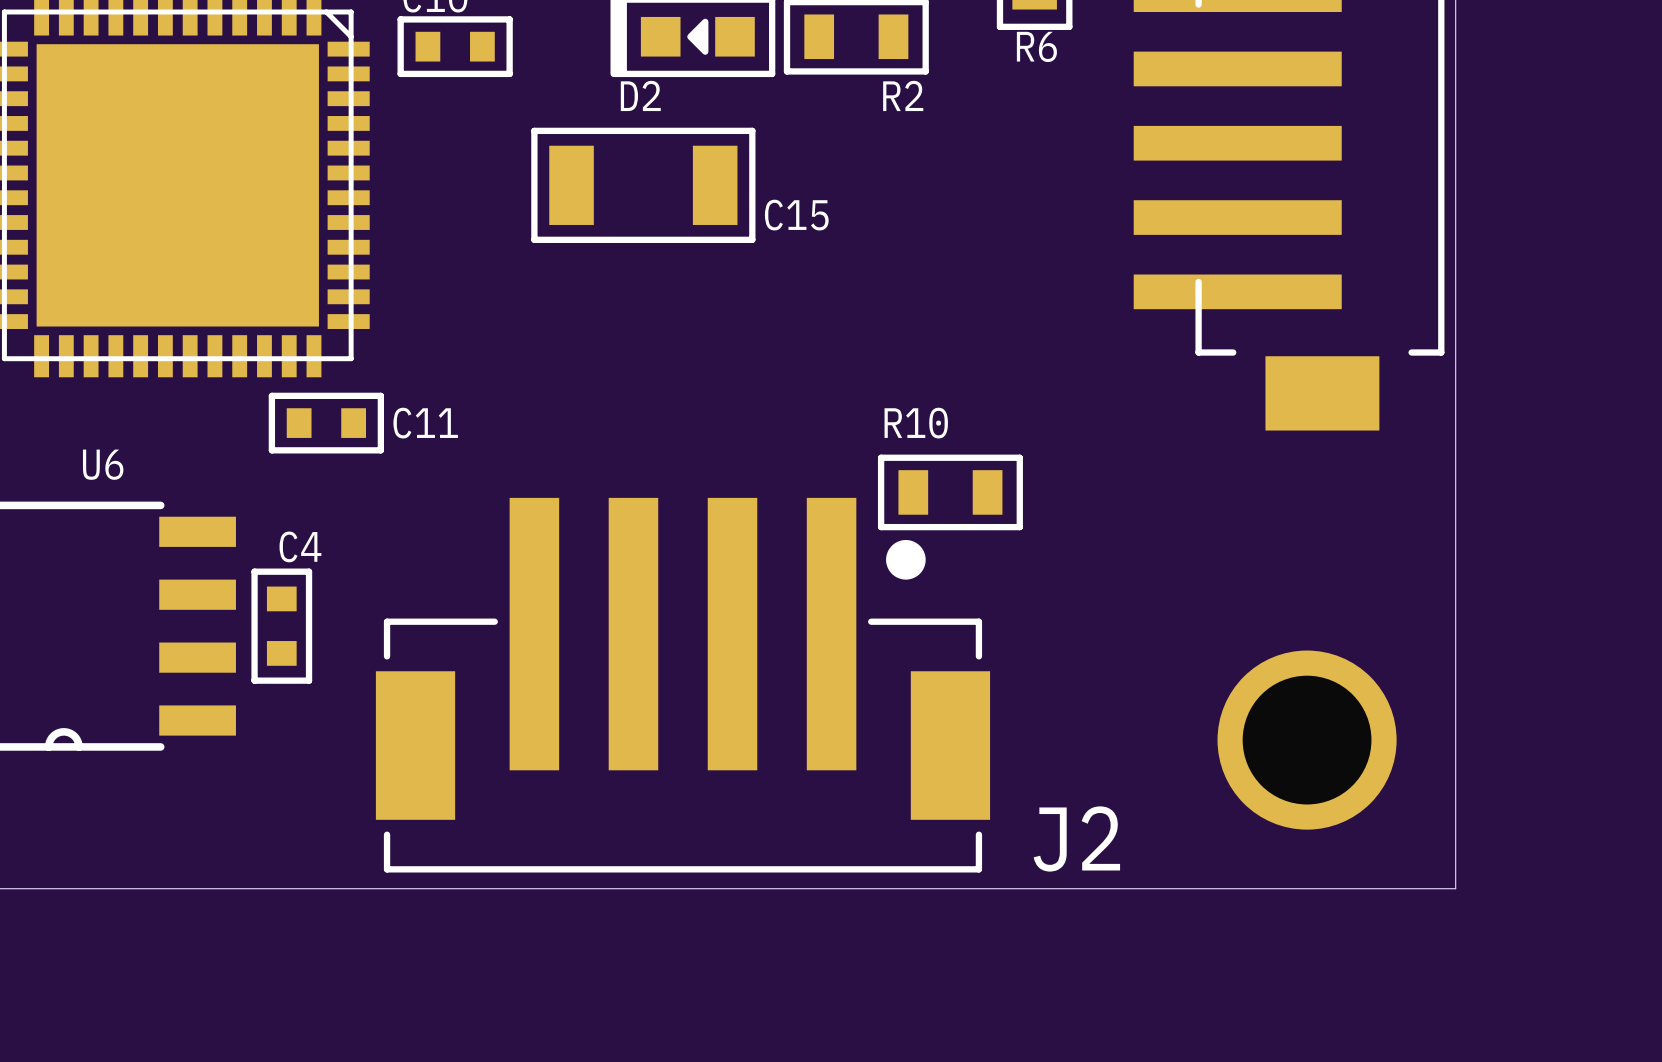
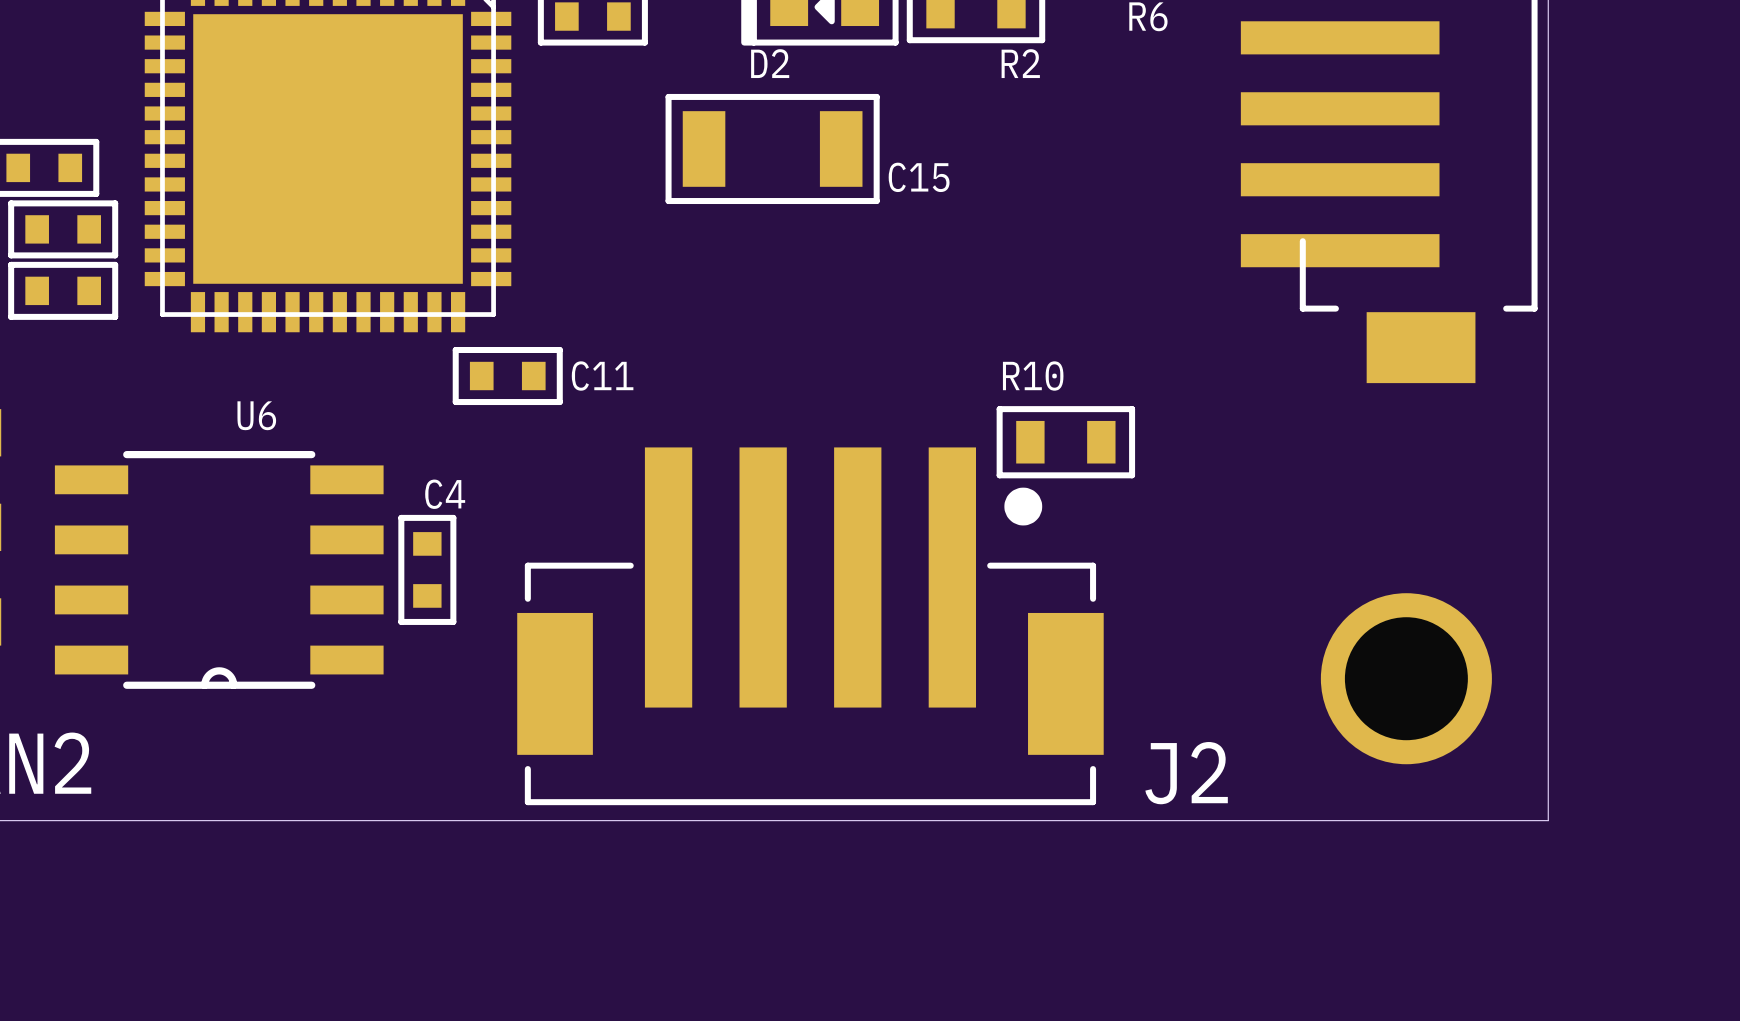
C11 position: (326, 423) -> (507, 376)

